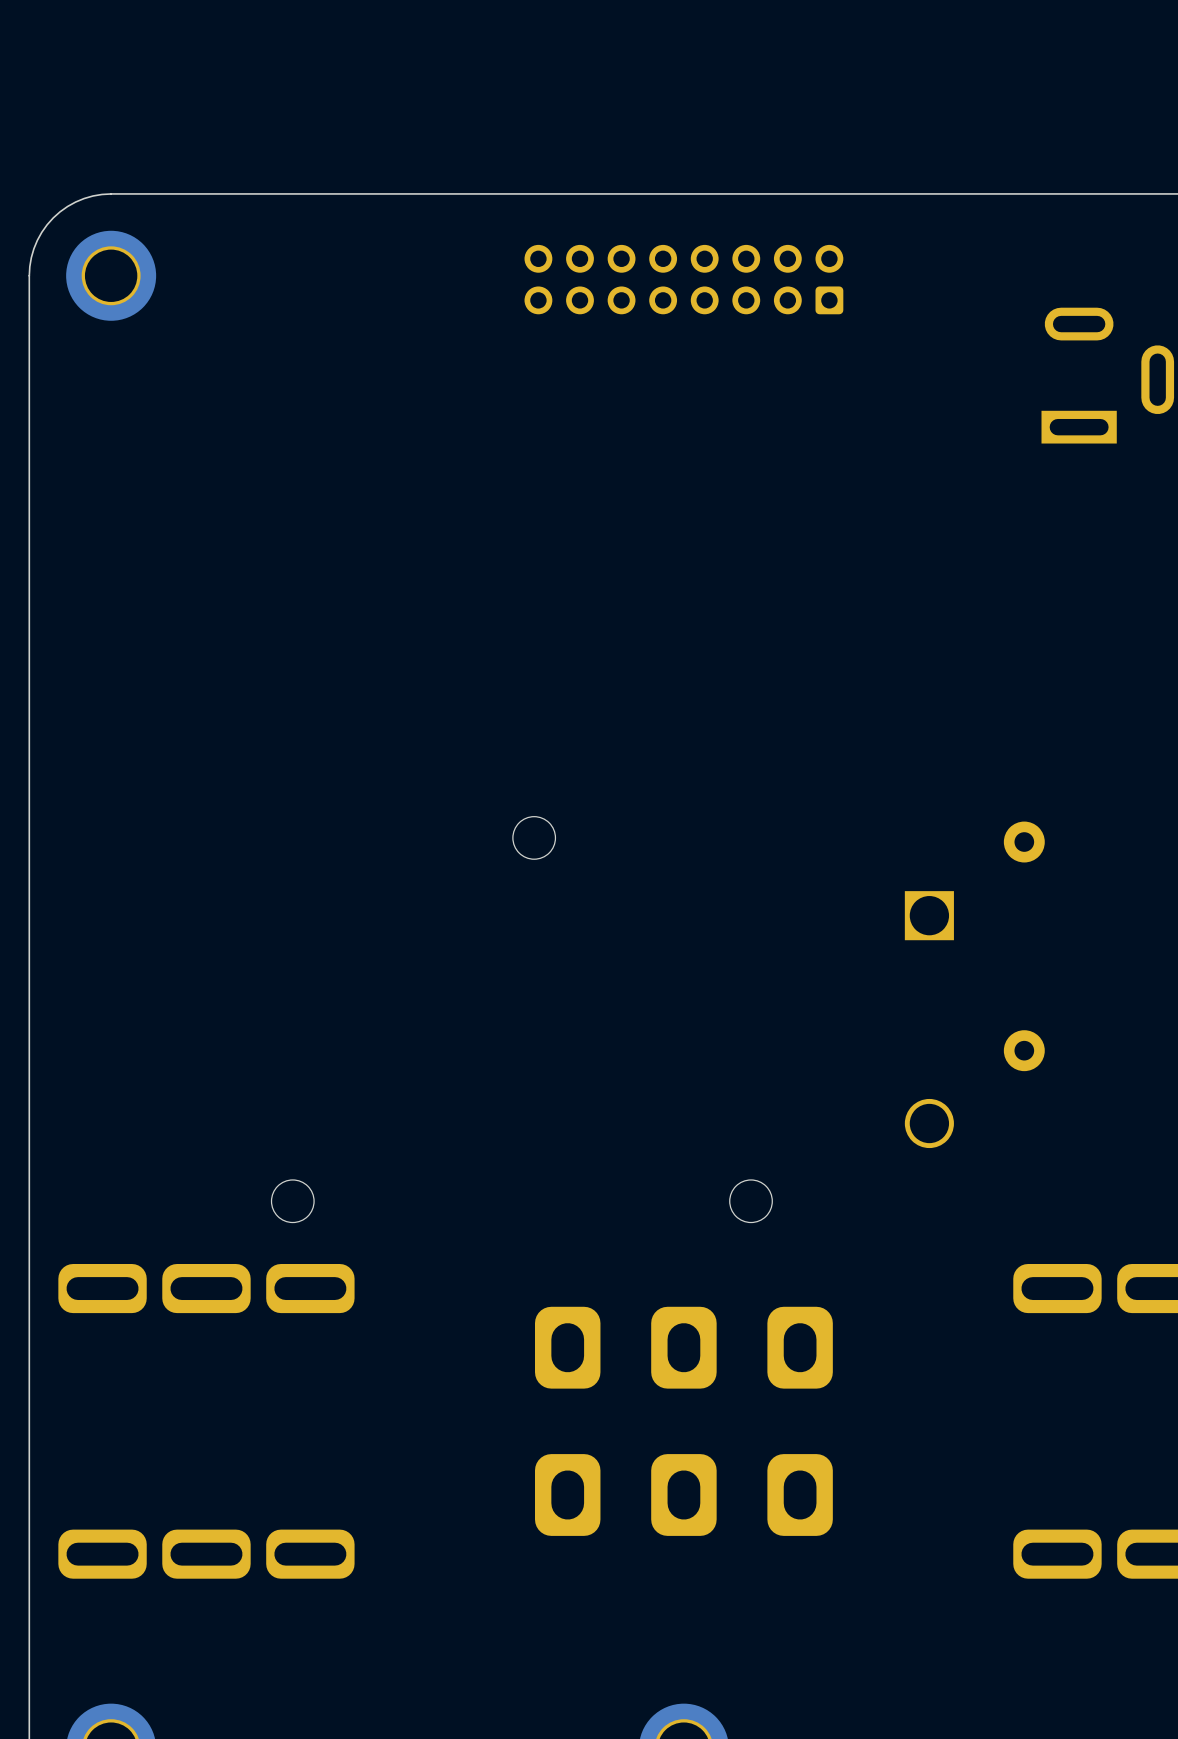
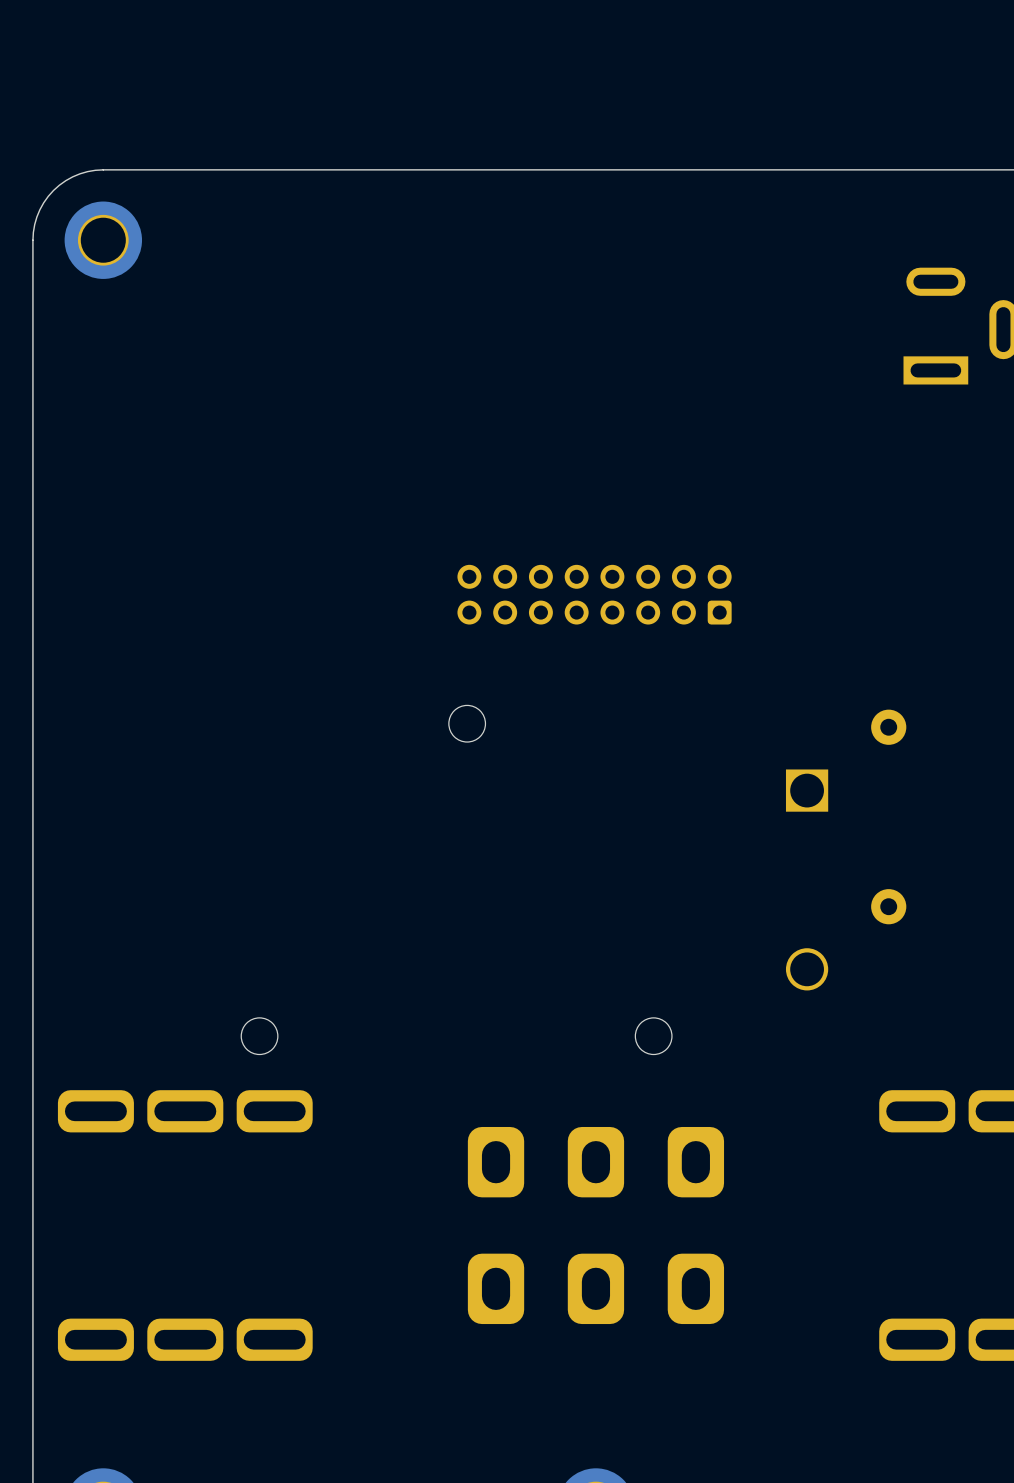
part position: (683, 279) -> (594, 594)

